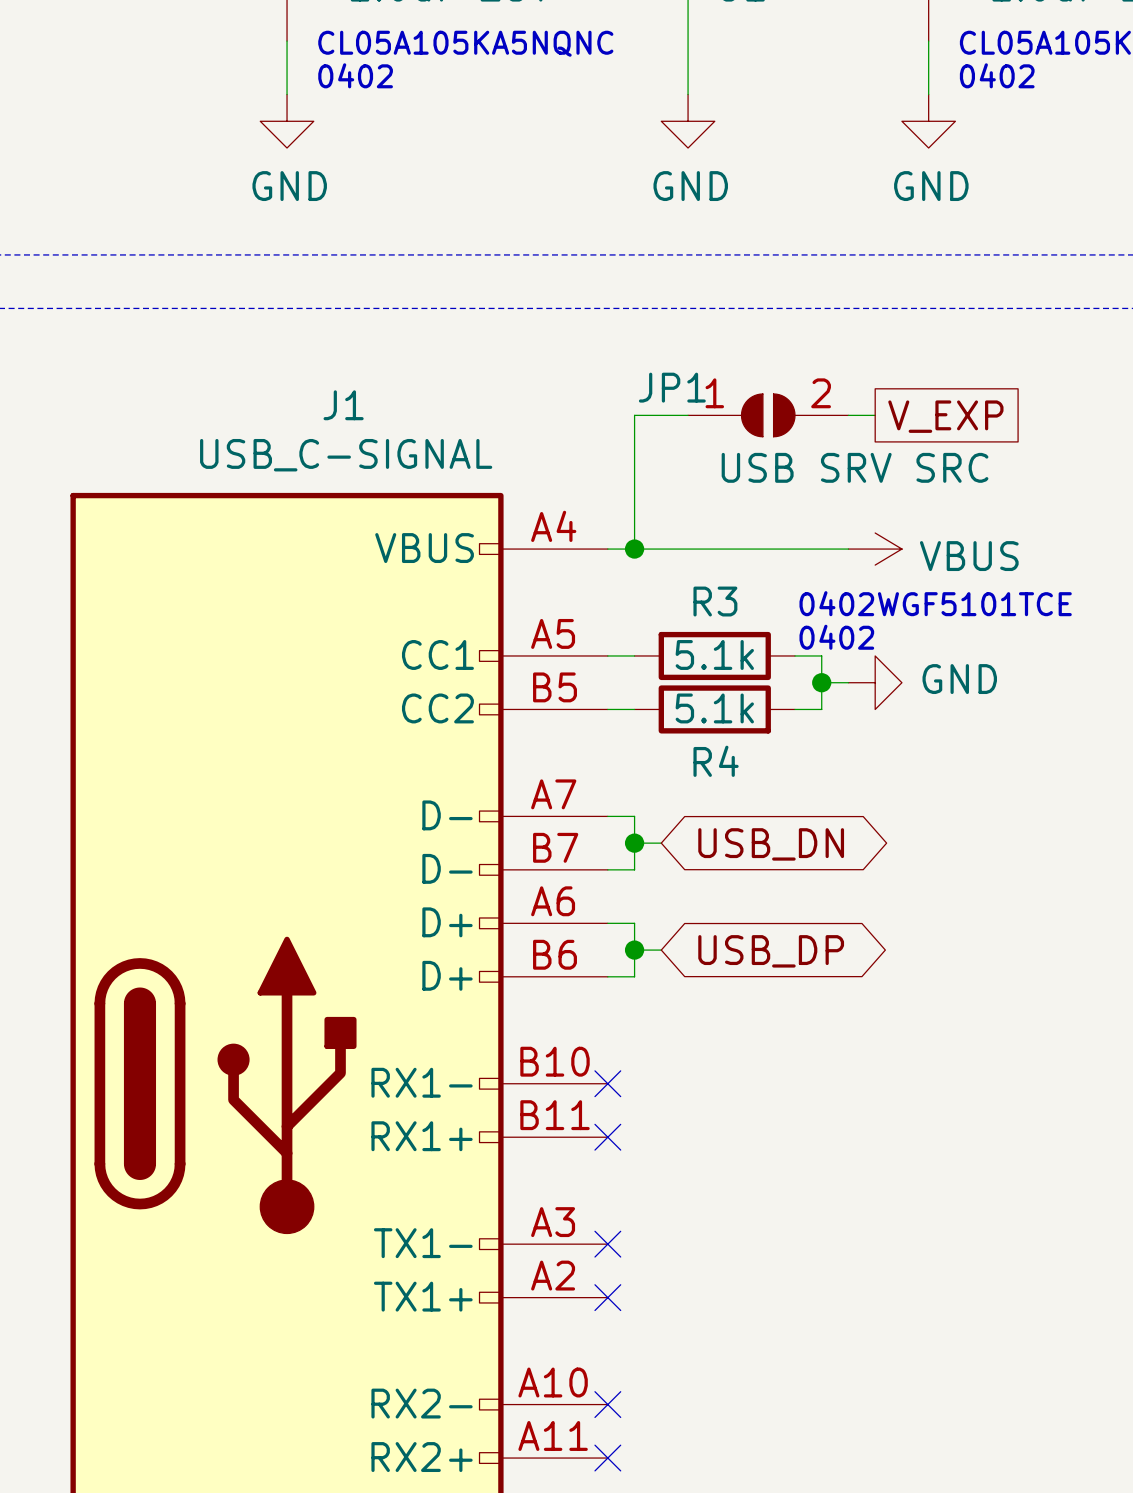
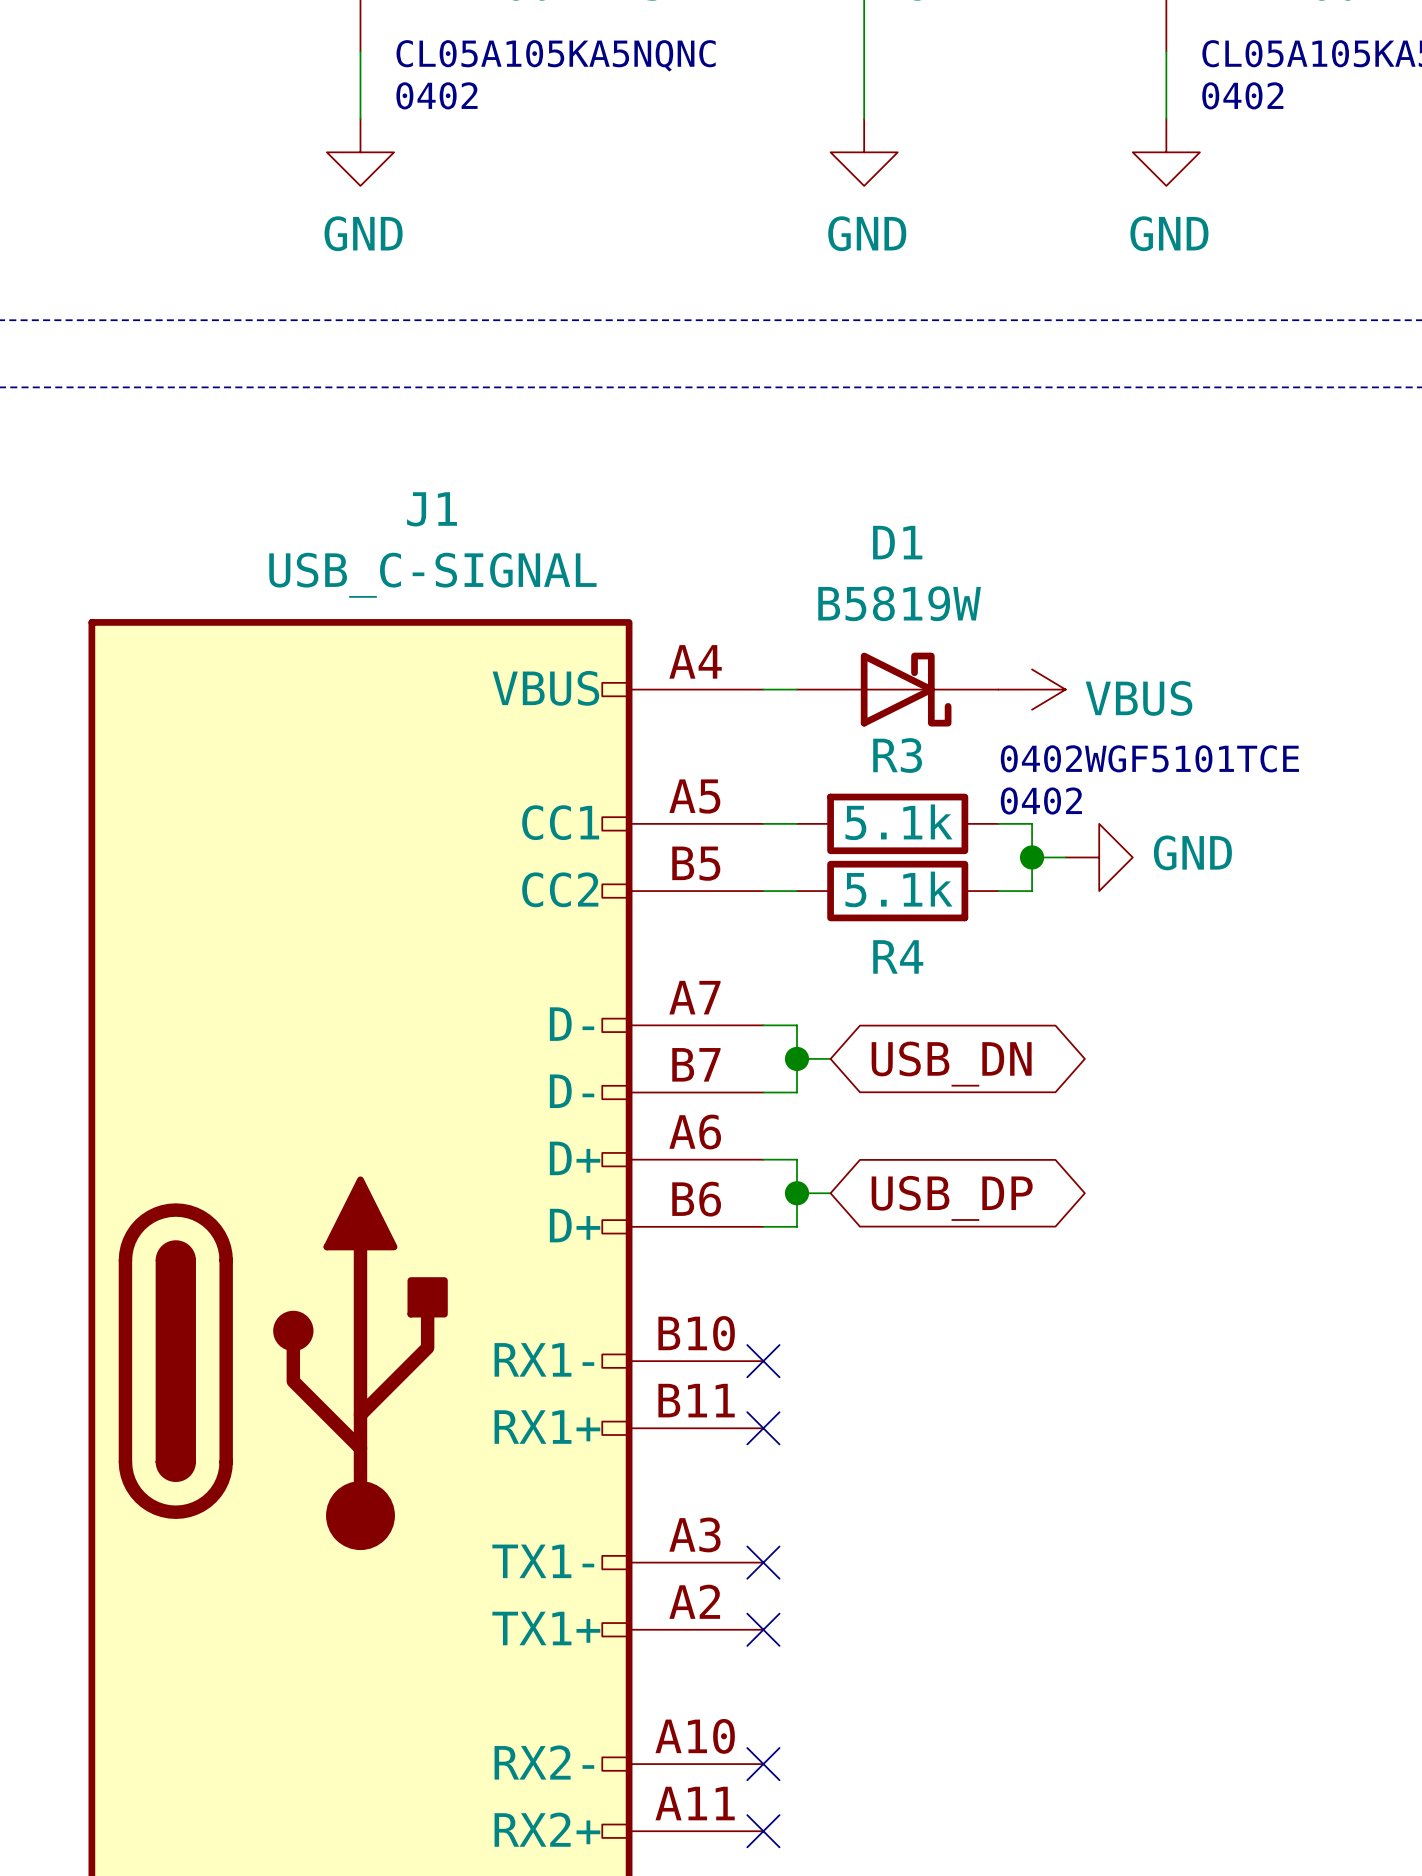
wire: (688, 415) (634, 415) (634, 549) (848, 549) -> none
JP1: USB SRV SRC (768, 415) -> none
wire: (848, 415) (875, 415) -> none
global label: V_EXP (945, 416) -> none
junction: (634, 549) -> none
D1: none -> B5819W (897, 689)
power symbol position: VBUS (875, 549) -> VBUS (1032, 689)

